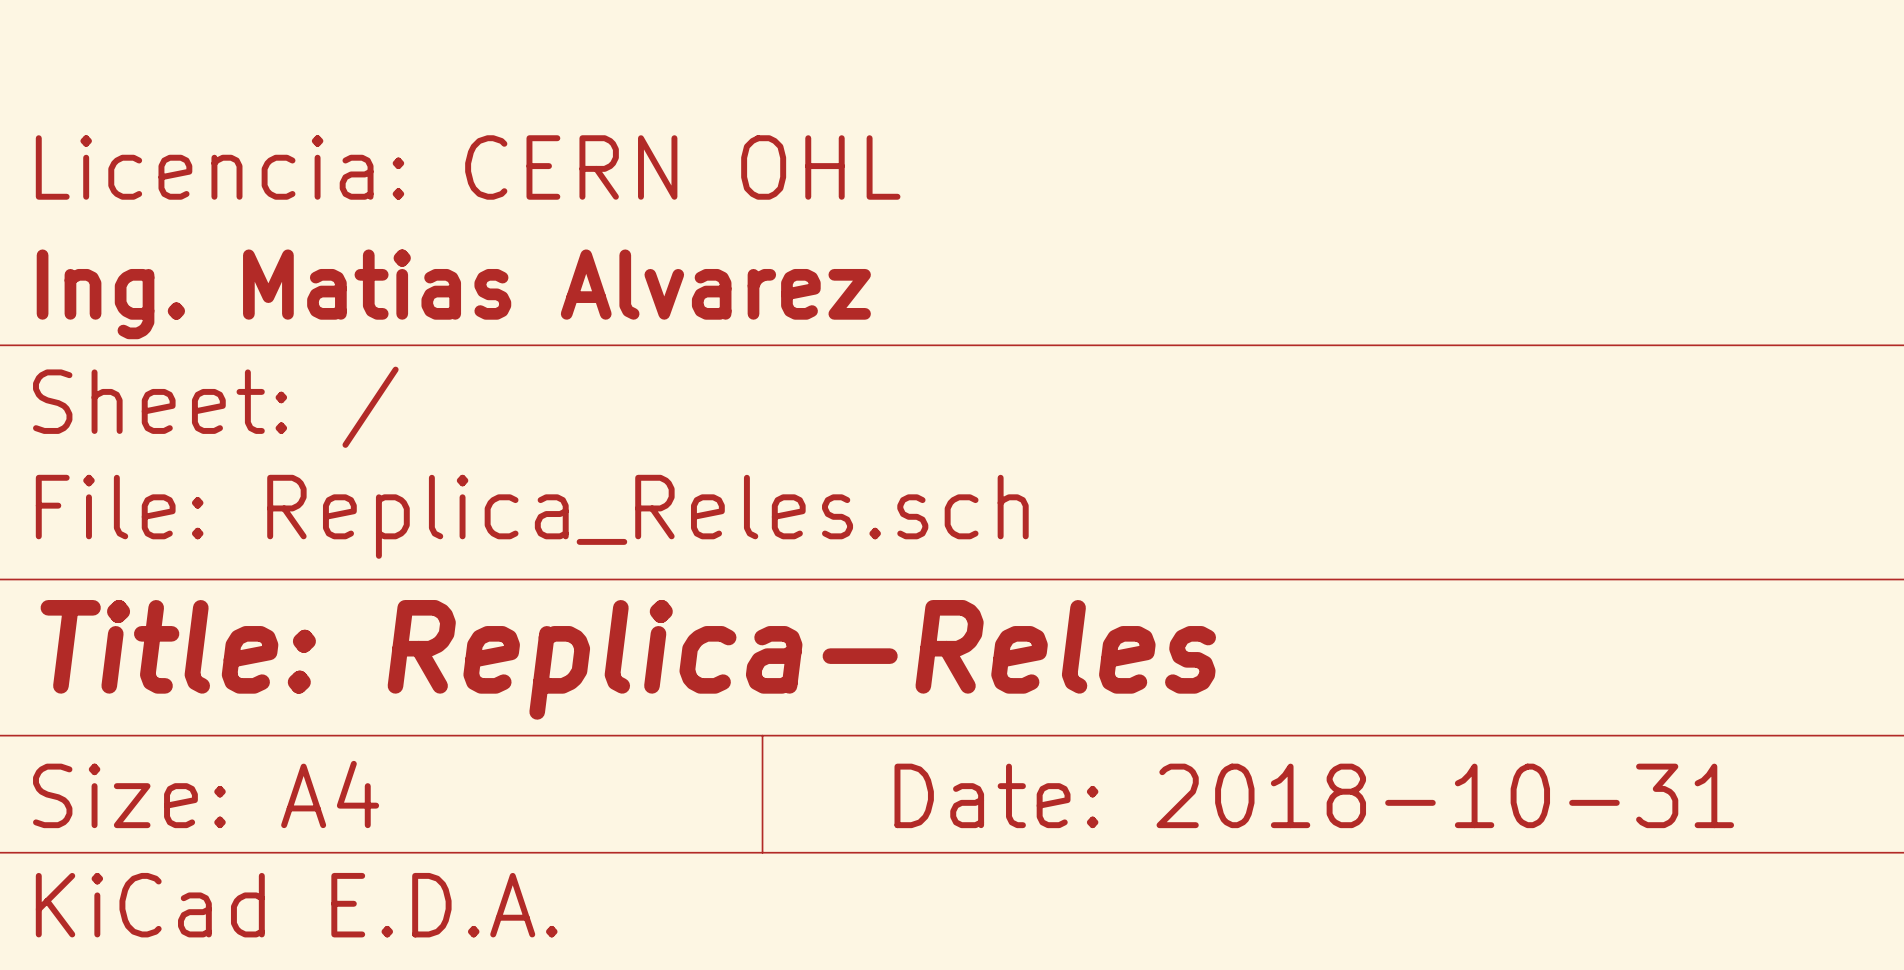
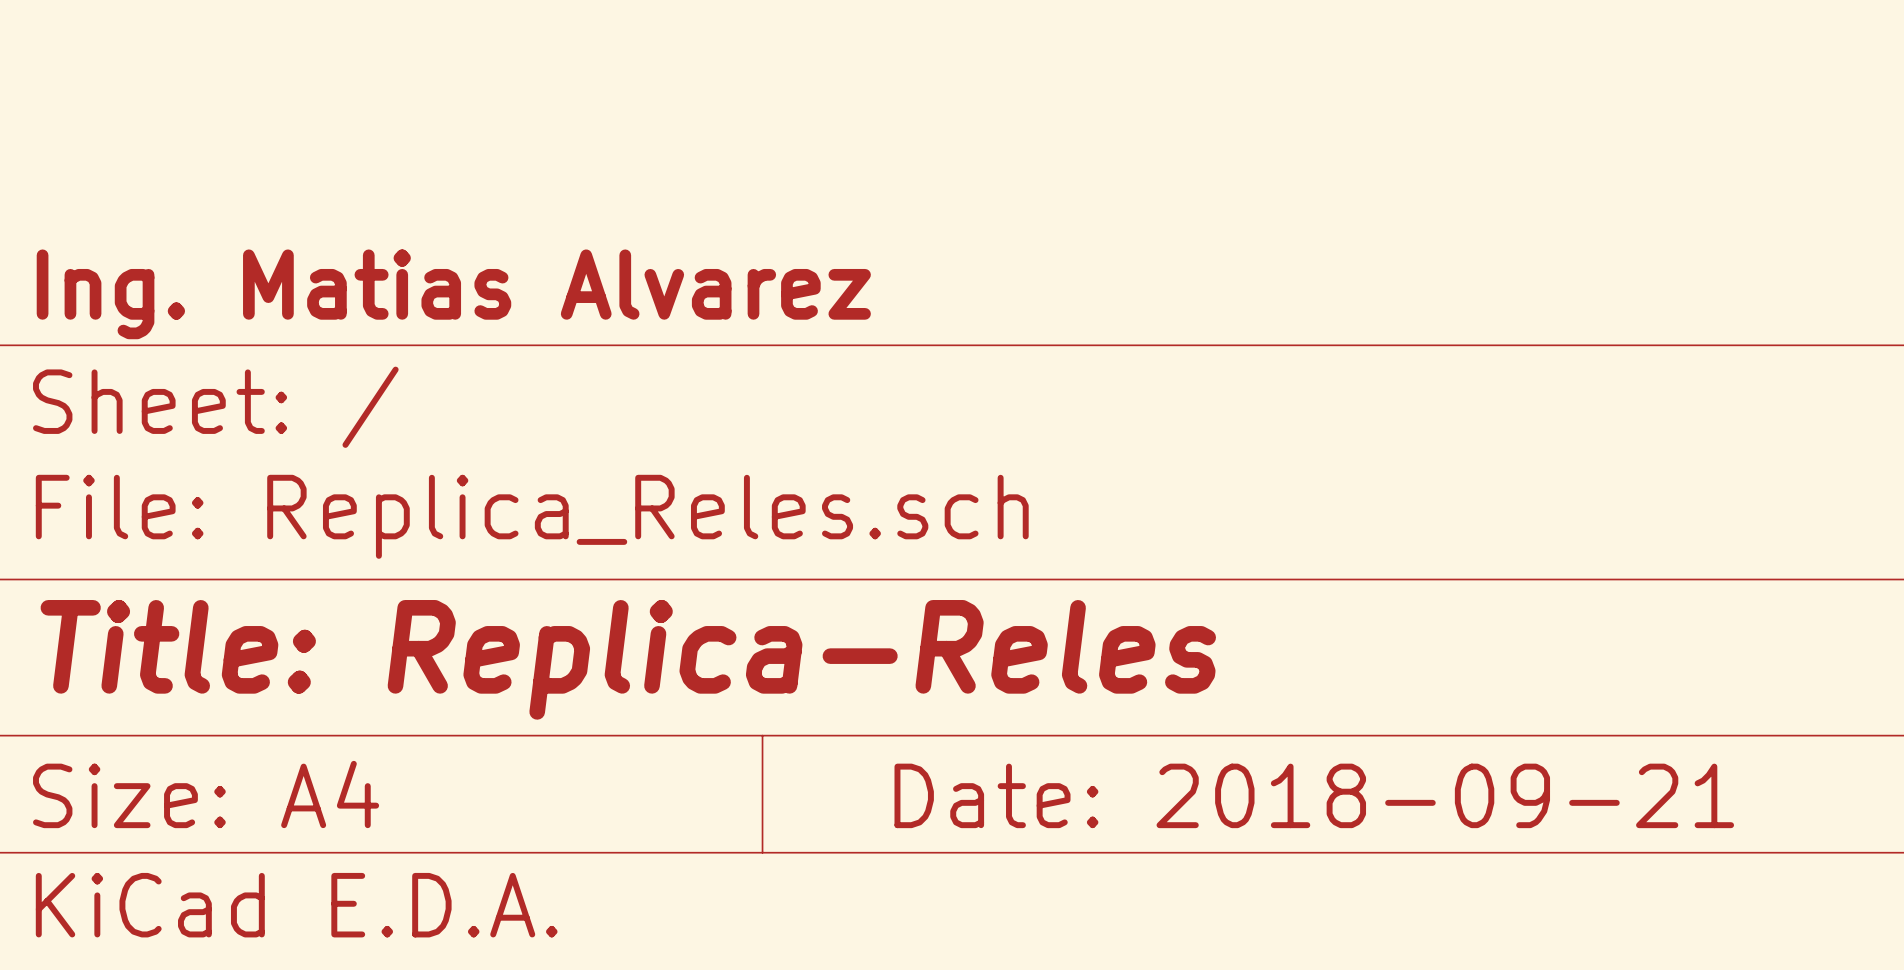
title block: Licencia: CERN OHL (468, 167) -> none
title block: Date: 2018-10-31 (1314, 795) -> Date: 2018-09-21 (1314, 795)

